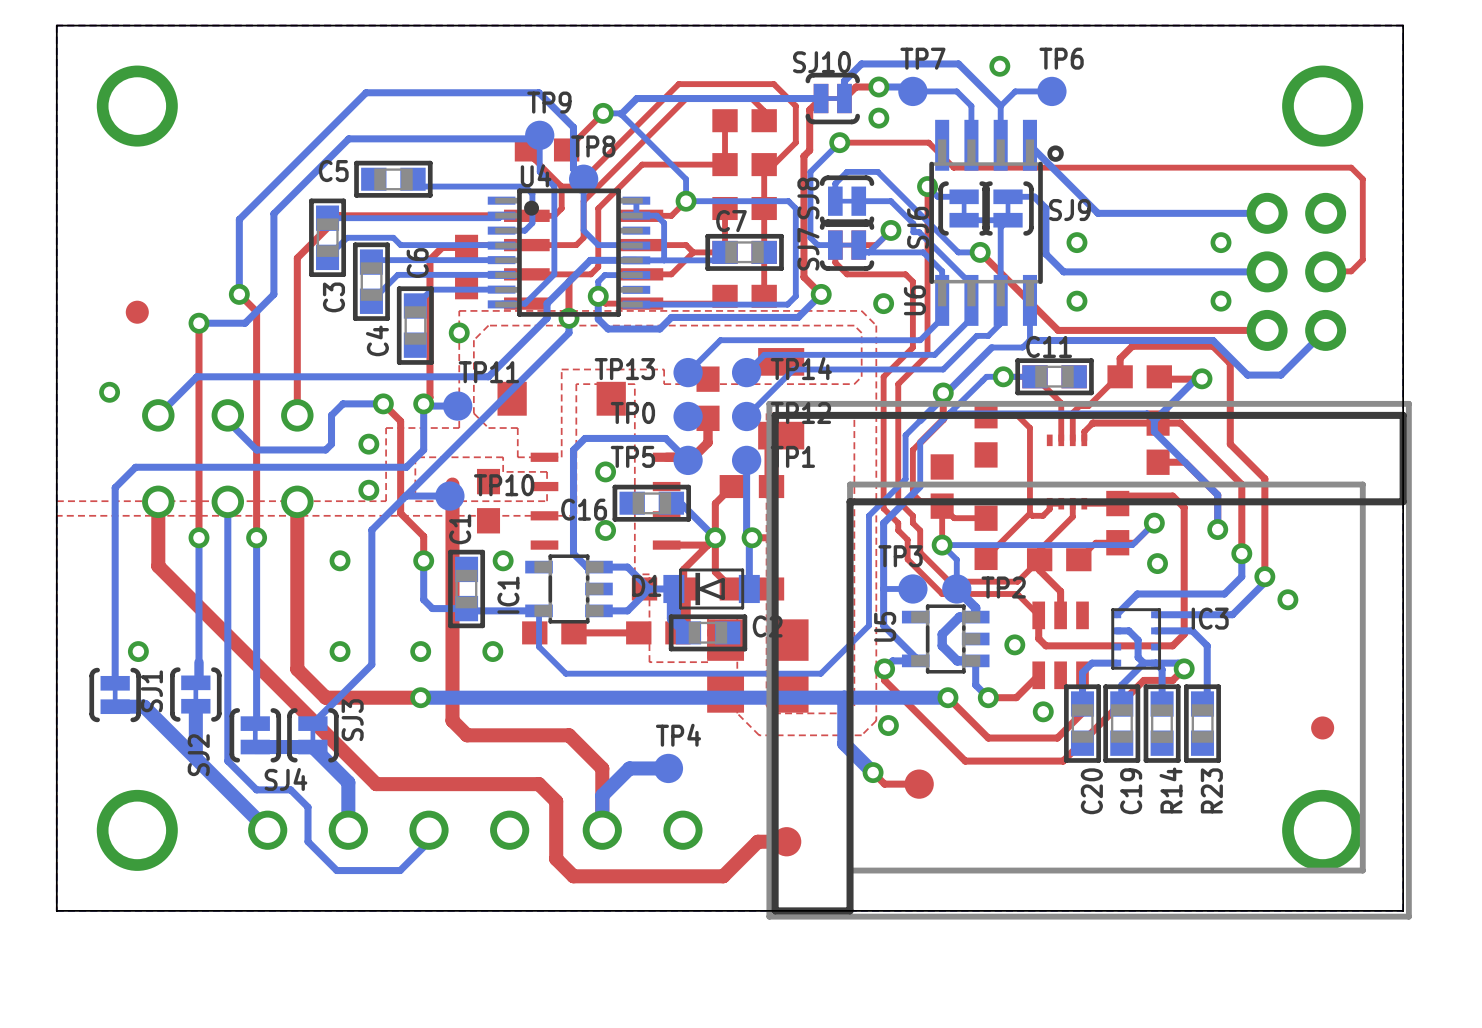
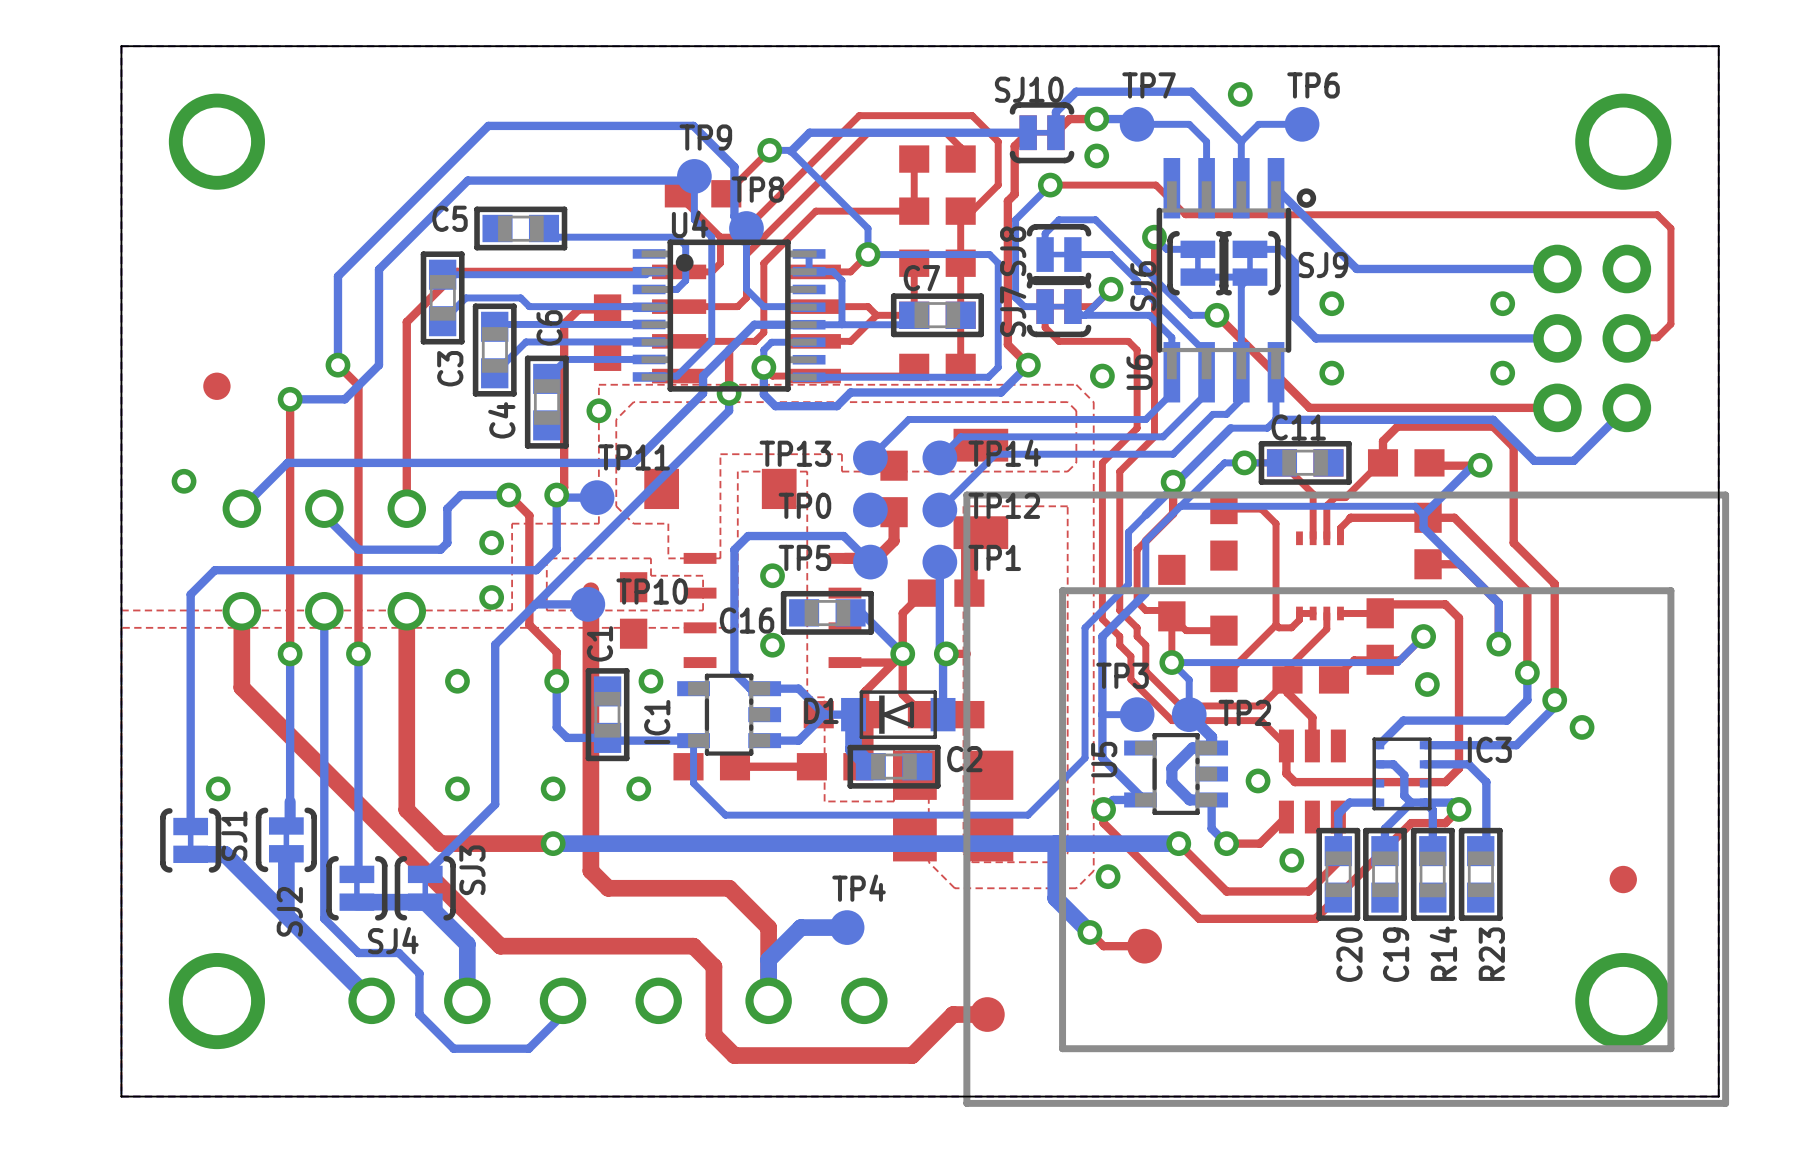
line: (1403, 415) (775, 415) (775, 910) (850, 910) (850, 501) (1403, 501) (1403, 415) -> none

